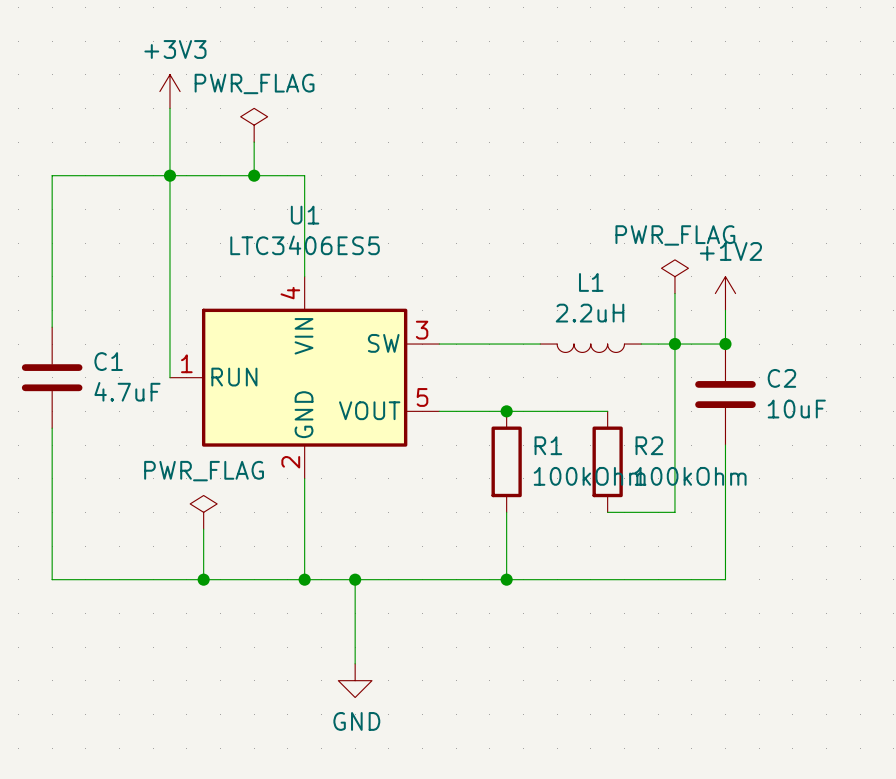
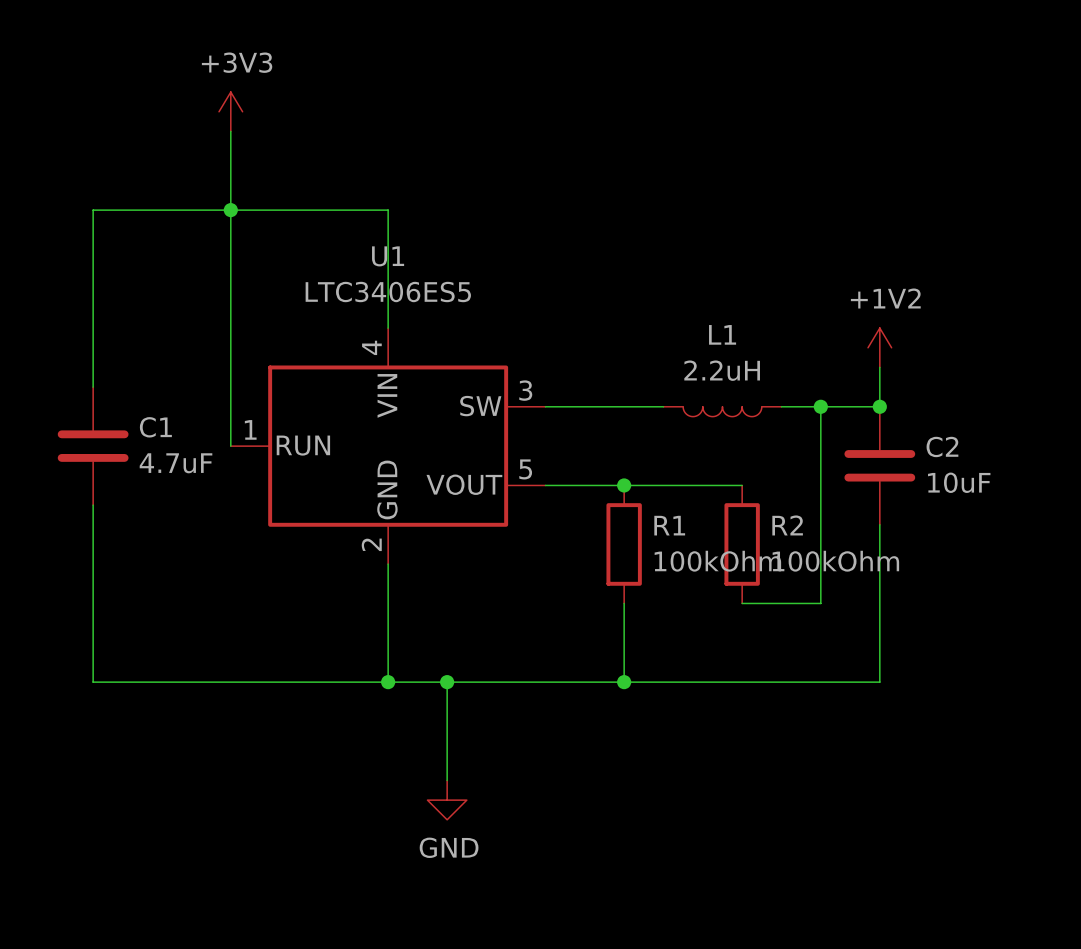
power symbol: PWR_FLAG (254, 125) -> none
wire: (254, 142) (254, 175) -> none
junction: (254, 175) -> none
power symbol: PWR_FLAG (674, 276) -> none
wire: (674, 293) (674, 344) -> none
power symbol: PWR_FLAG (203, 512) -> none
wire: (203, 529) (203, 579) -> none
junction: (203, 579) -> none

